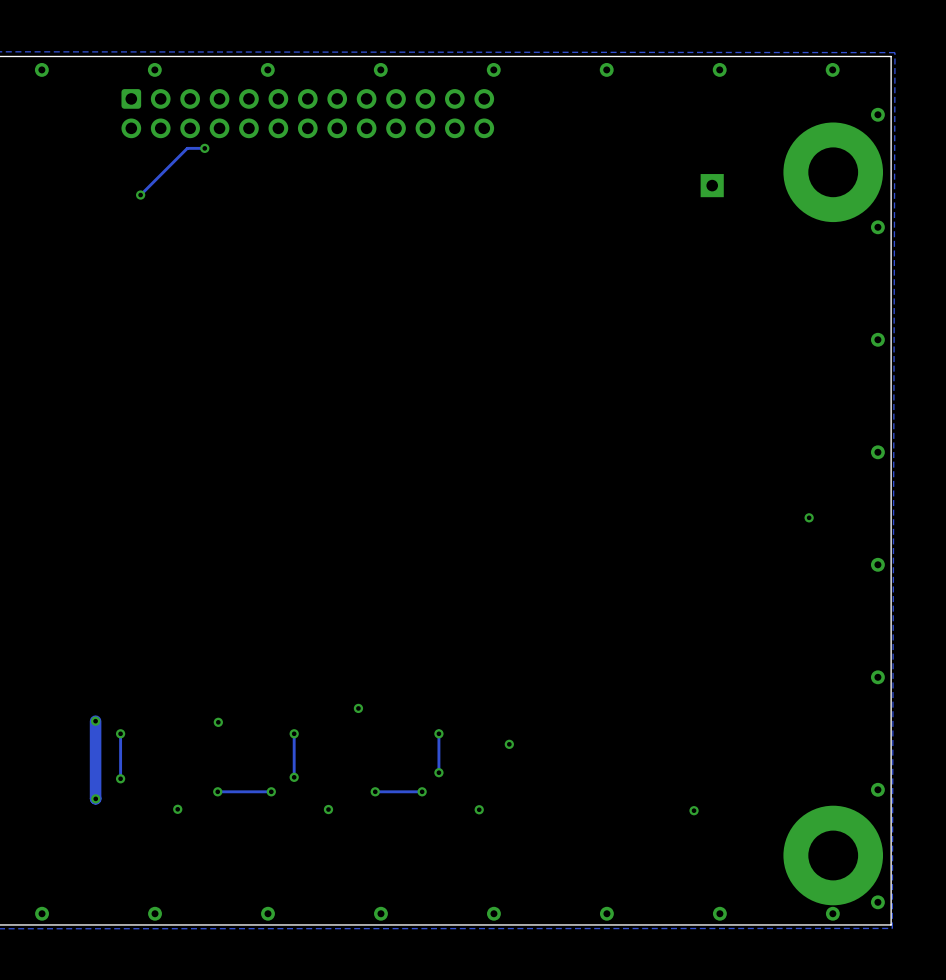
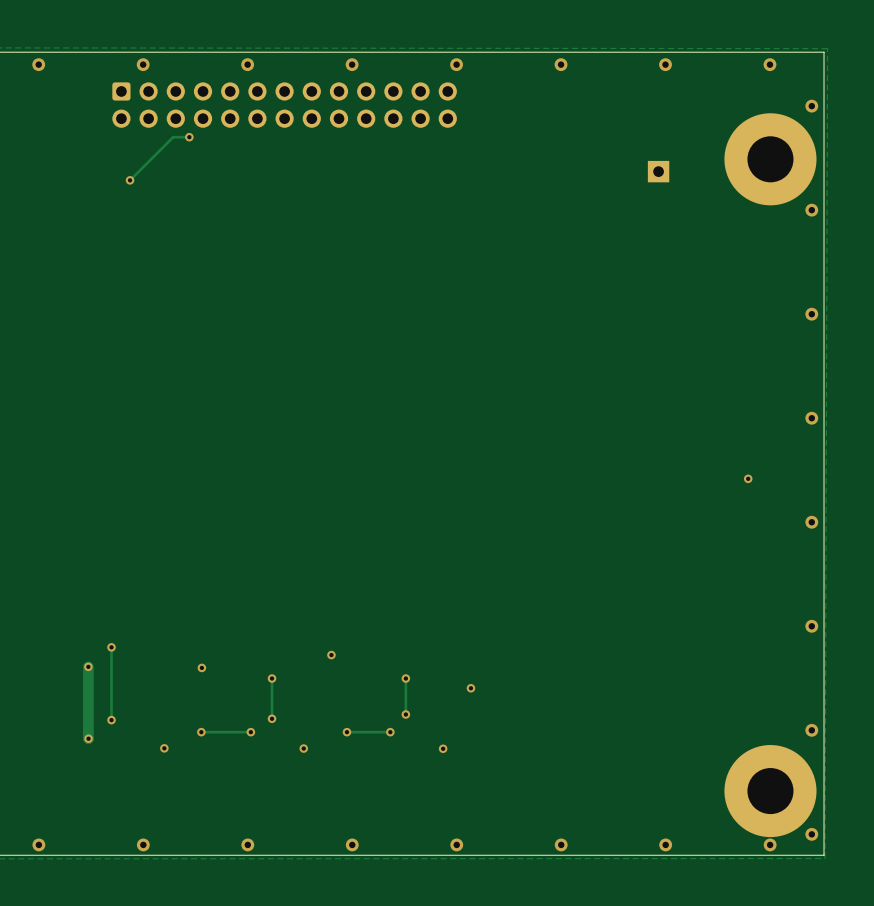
track: none -> (111, 647) (111, 678)
via position: (120, 733) -> (111, 647)
via: (694, 810) -> none

